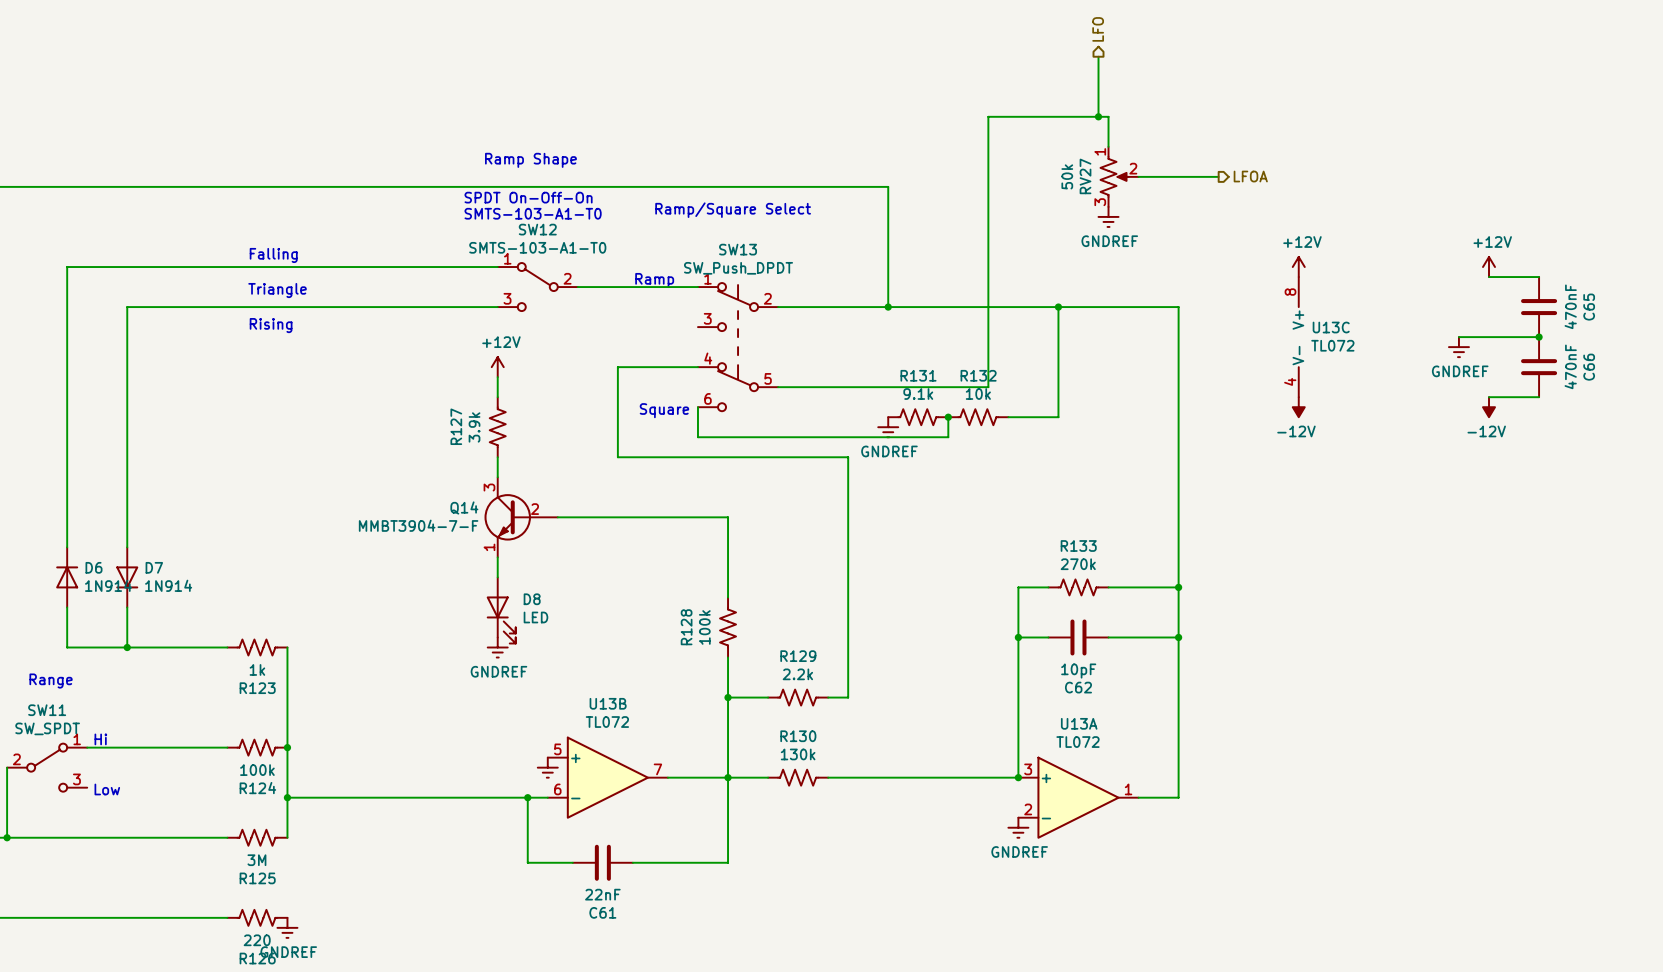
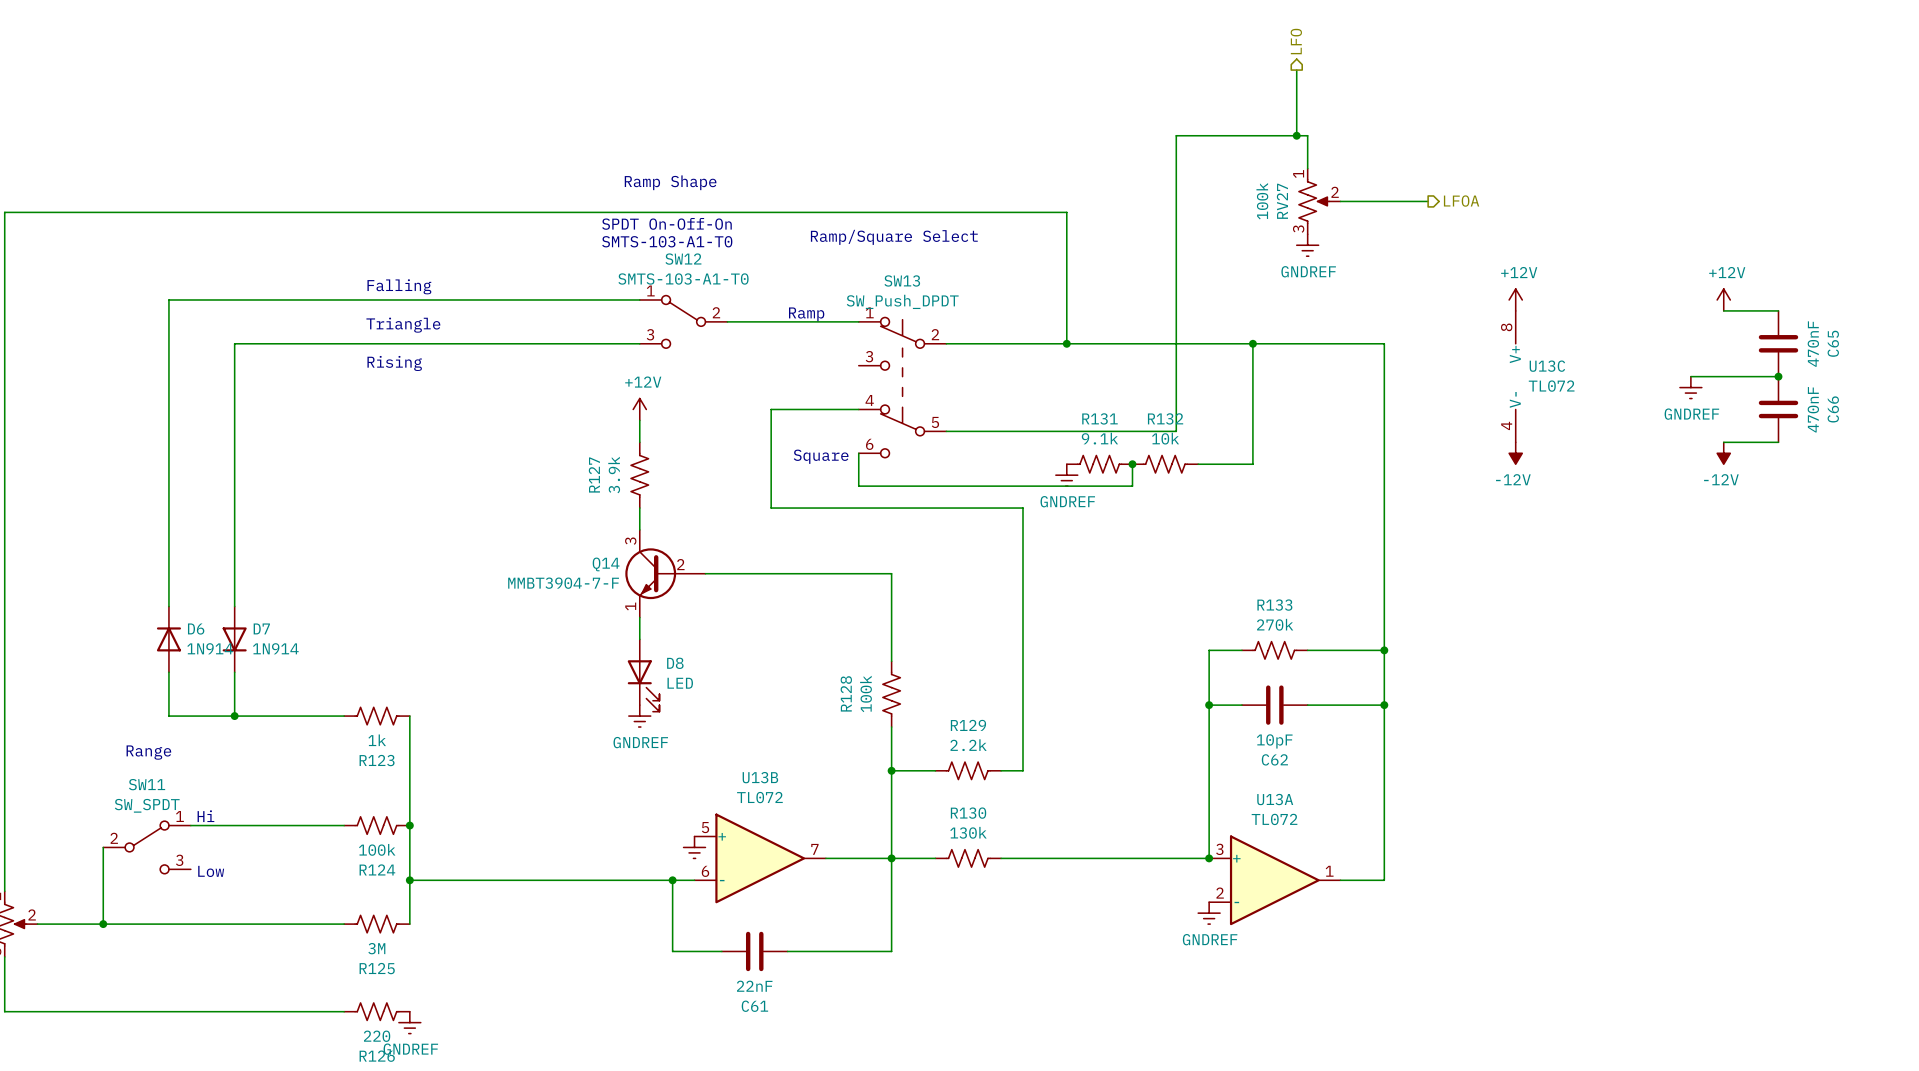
RV27 value: 50k (1067, 176) -> 100k (1262, 201)

